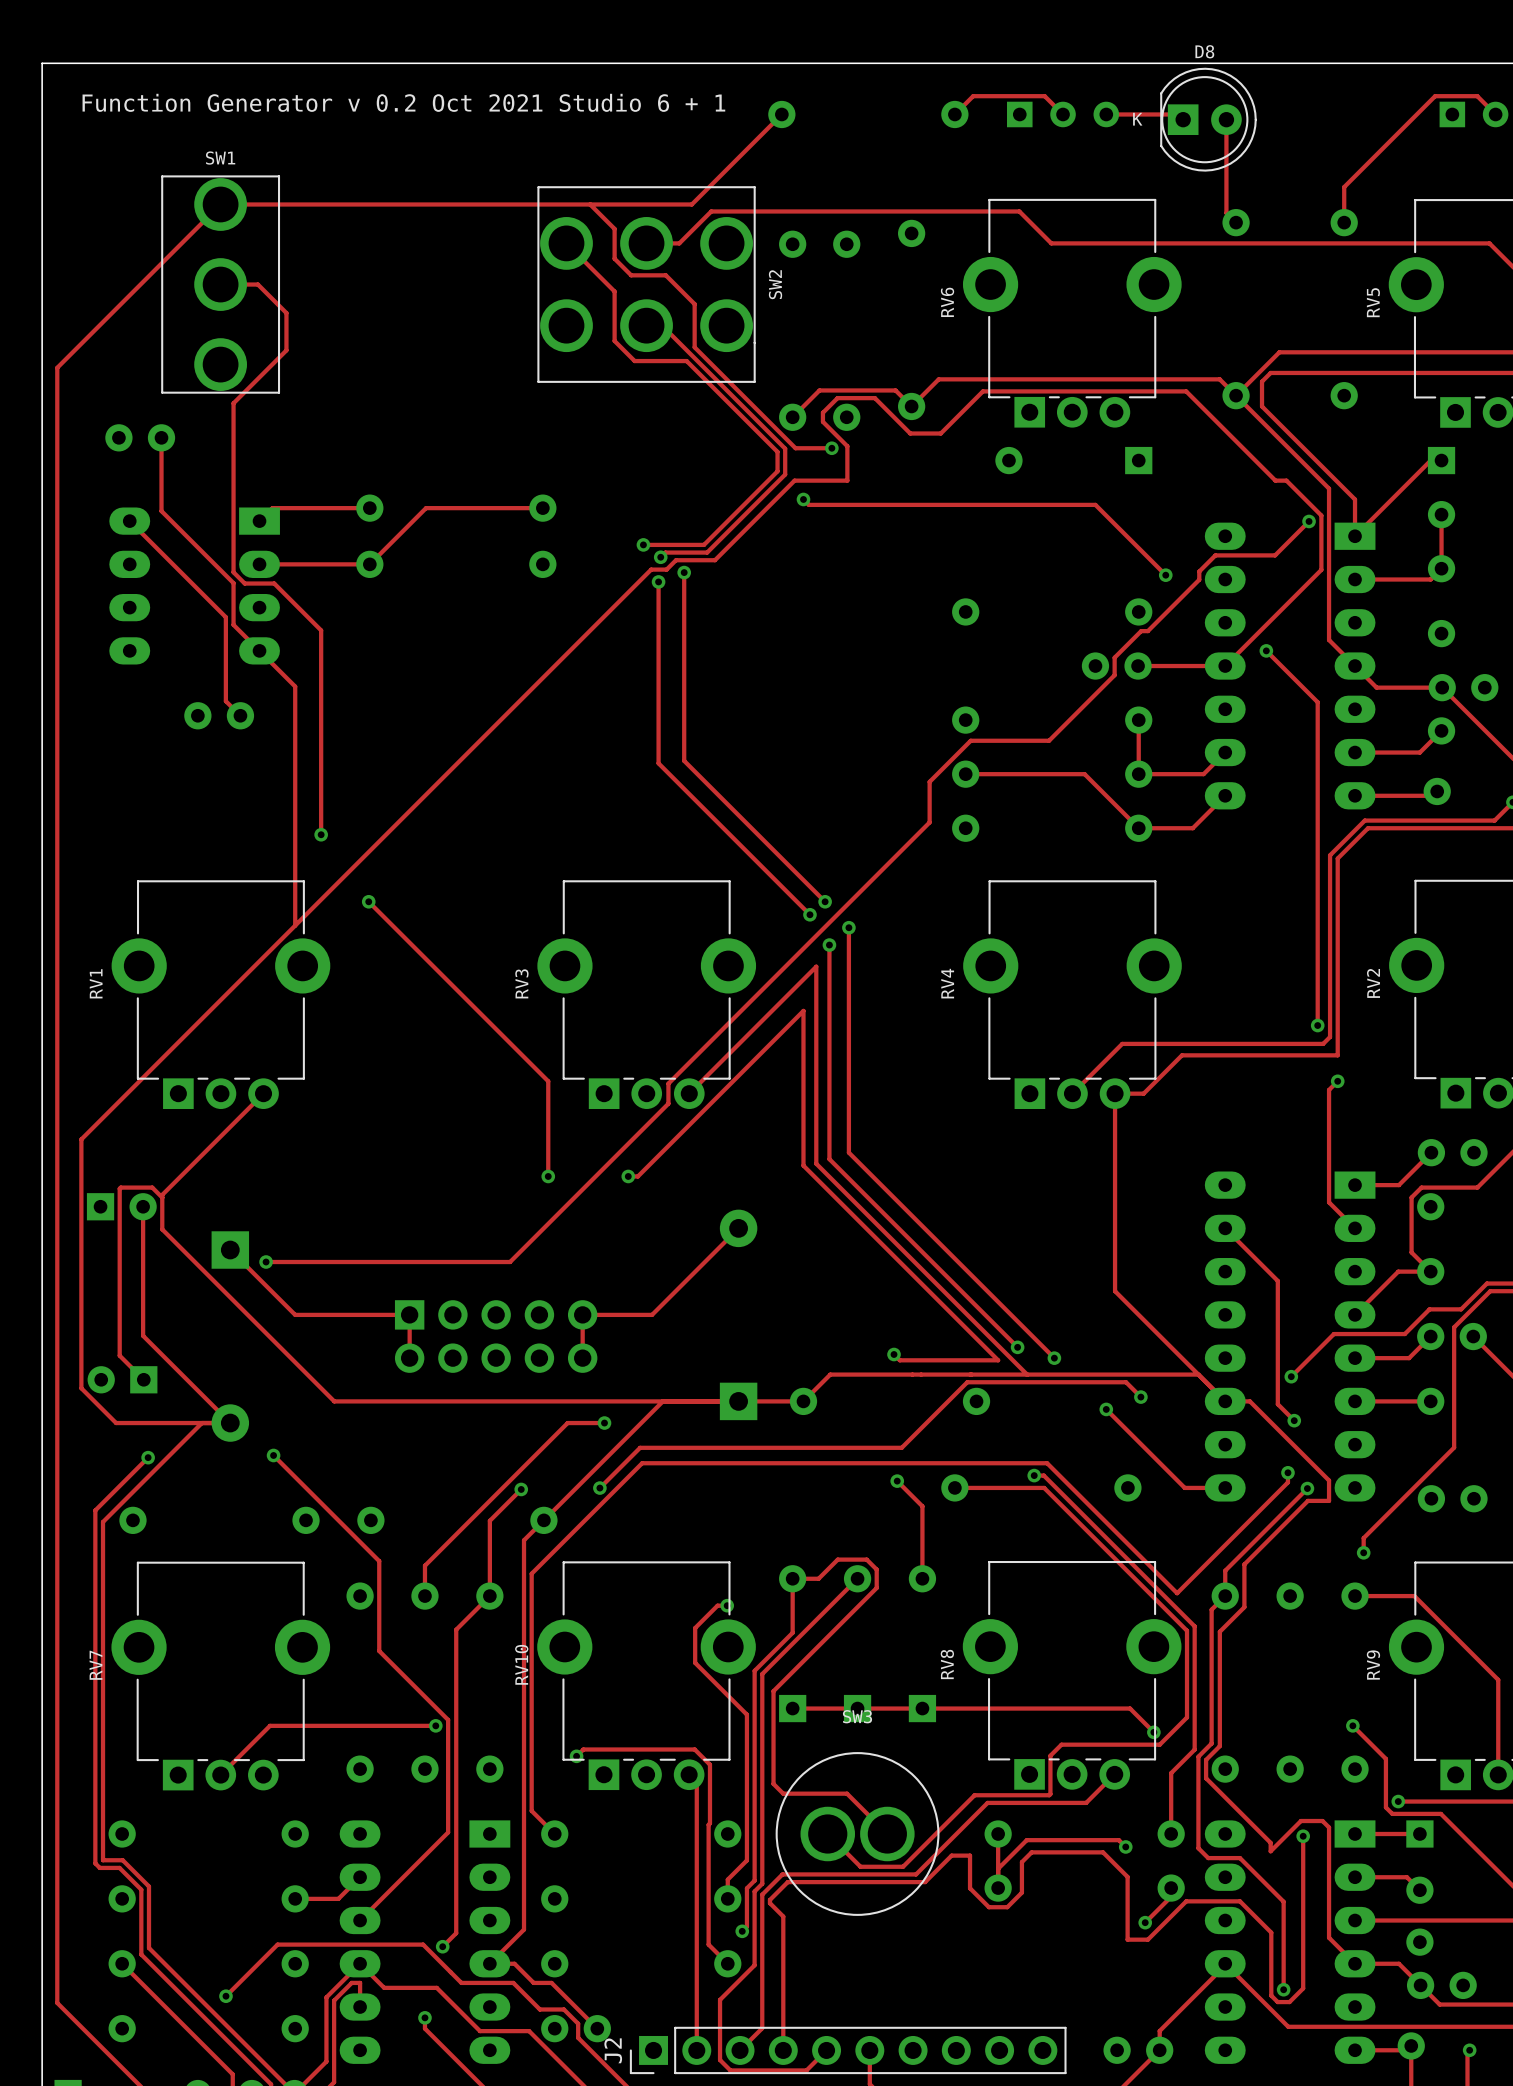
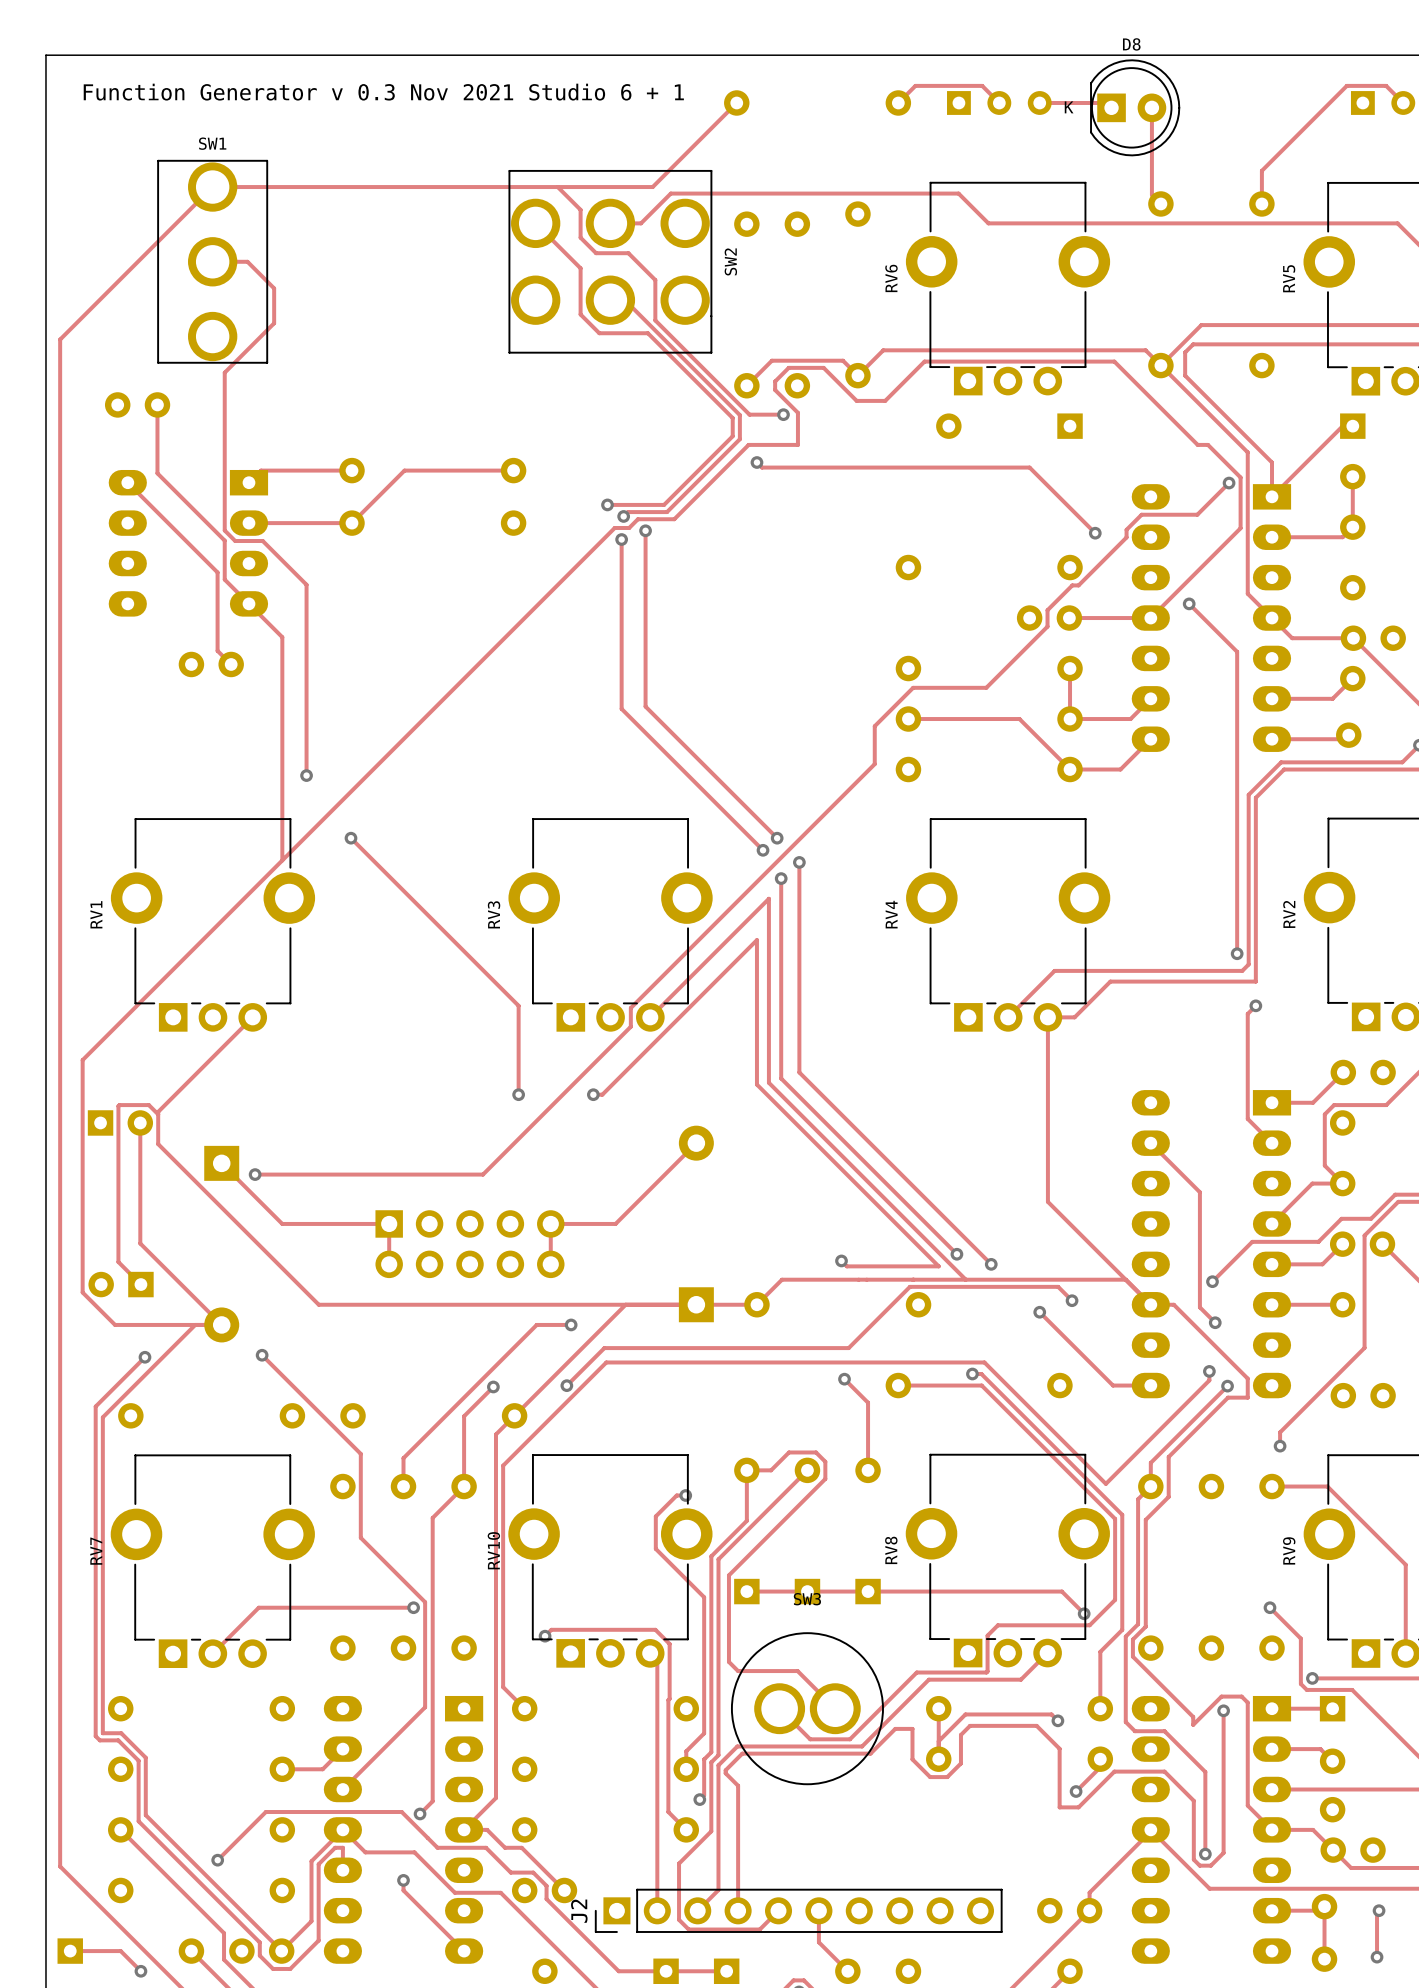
text: Function Generator v 0.2 Oct 2021 Studio 6 + 1 (403, 102) -> Function Generator v 0.3 Nov 2021 Studio 6 + 1 (383, 92)

